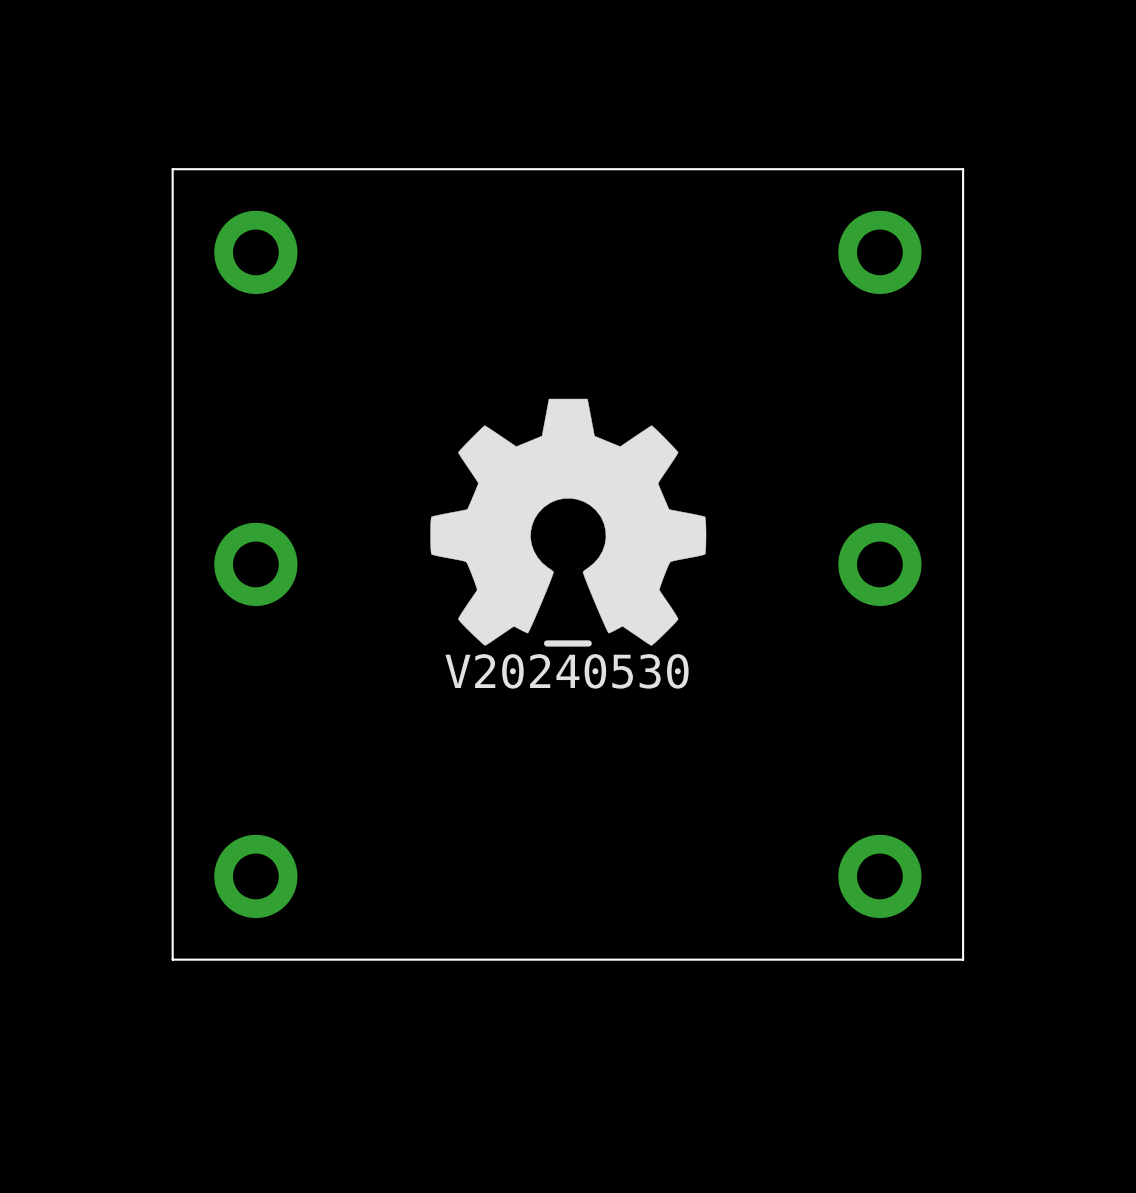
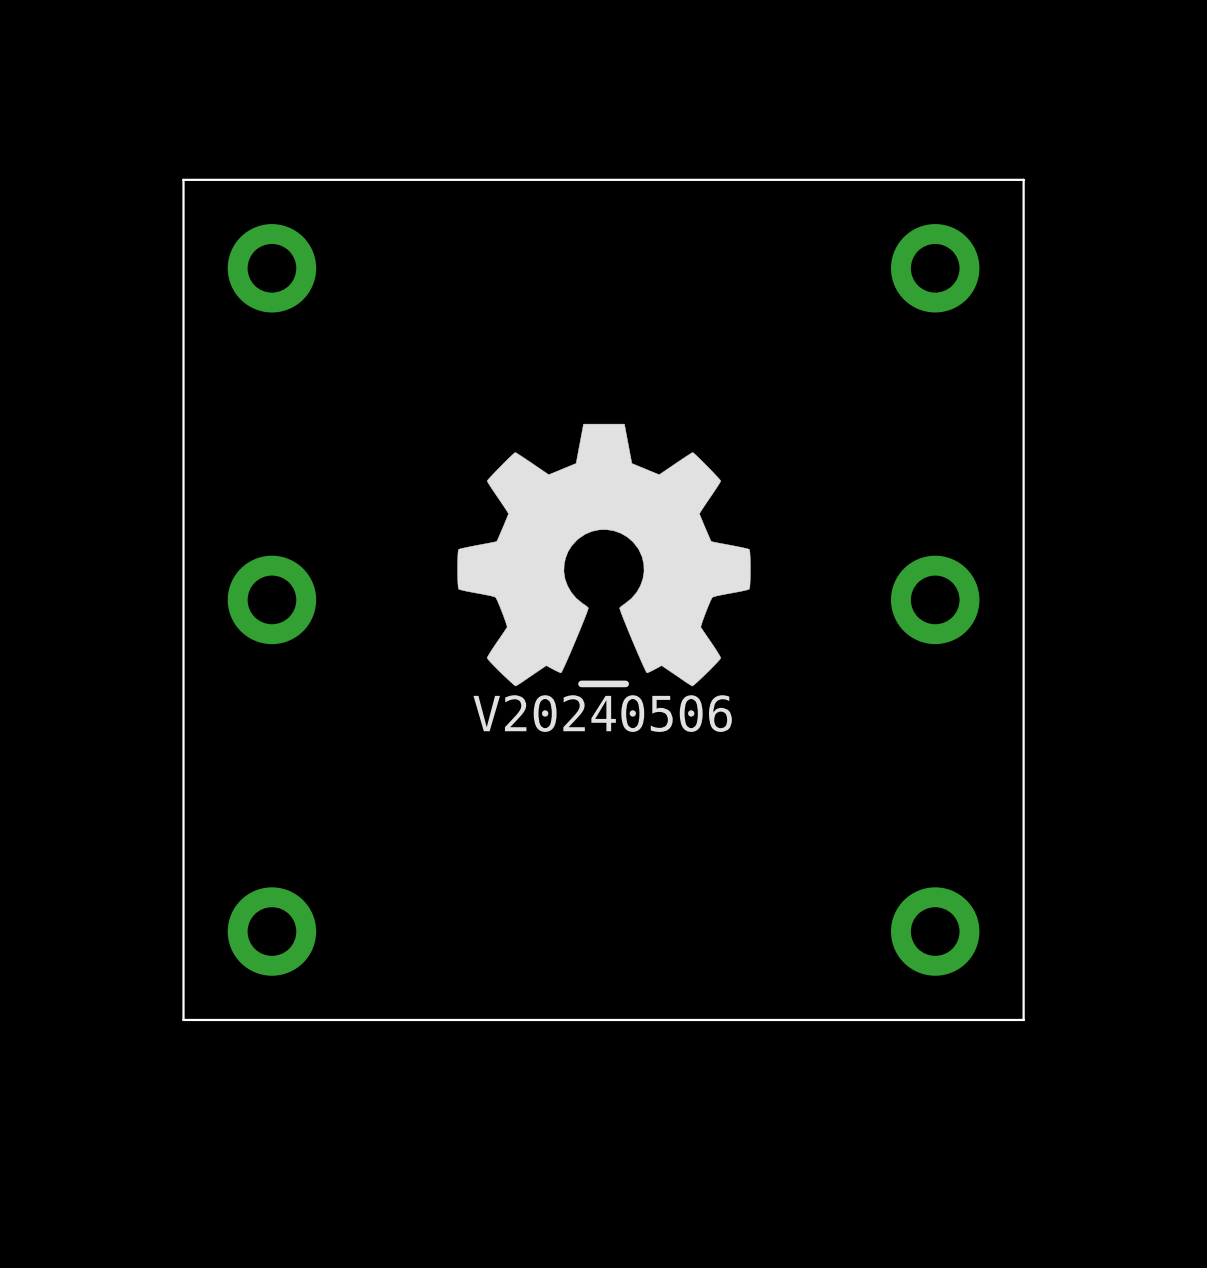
drawing shape: [445, 640, 689, 689] -> [473, 680, 732, 732]

